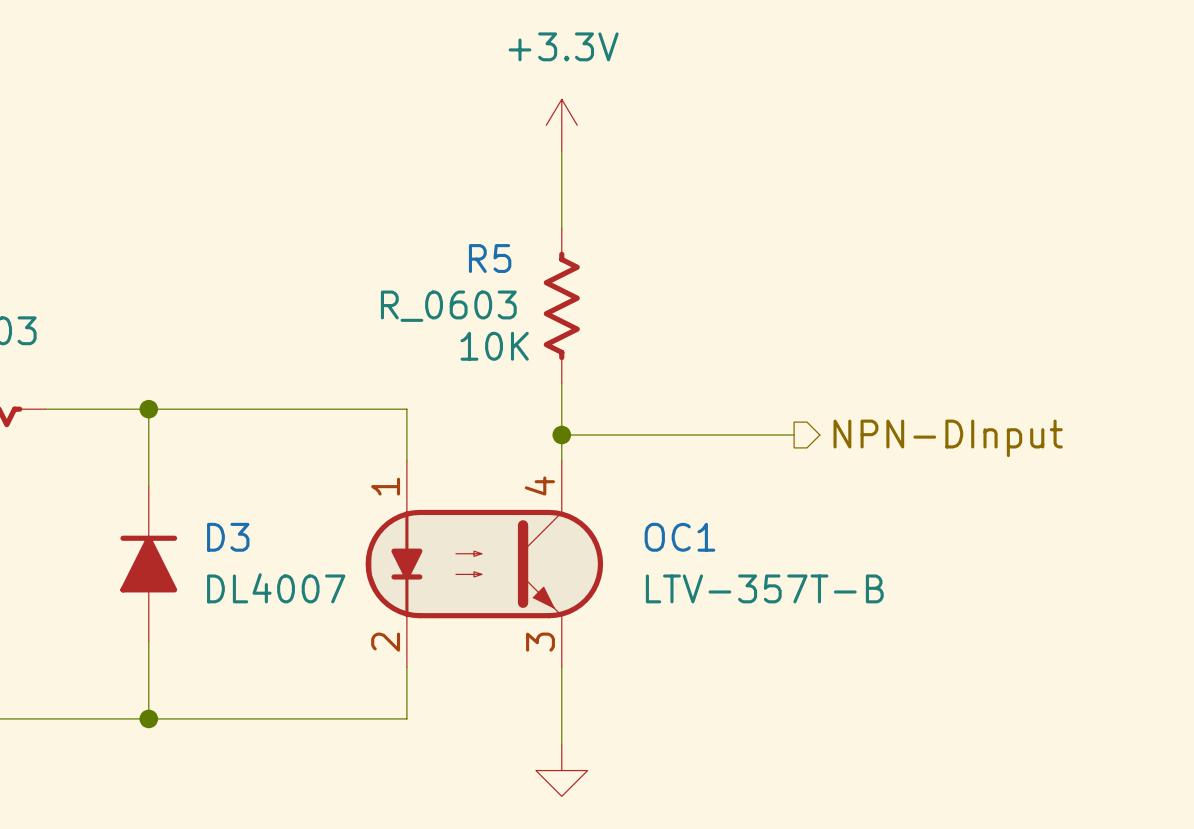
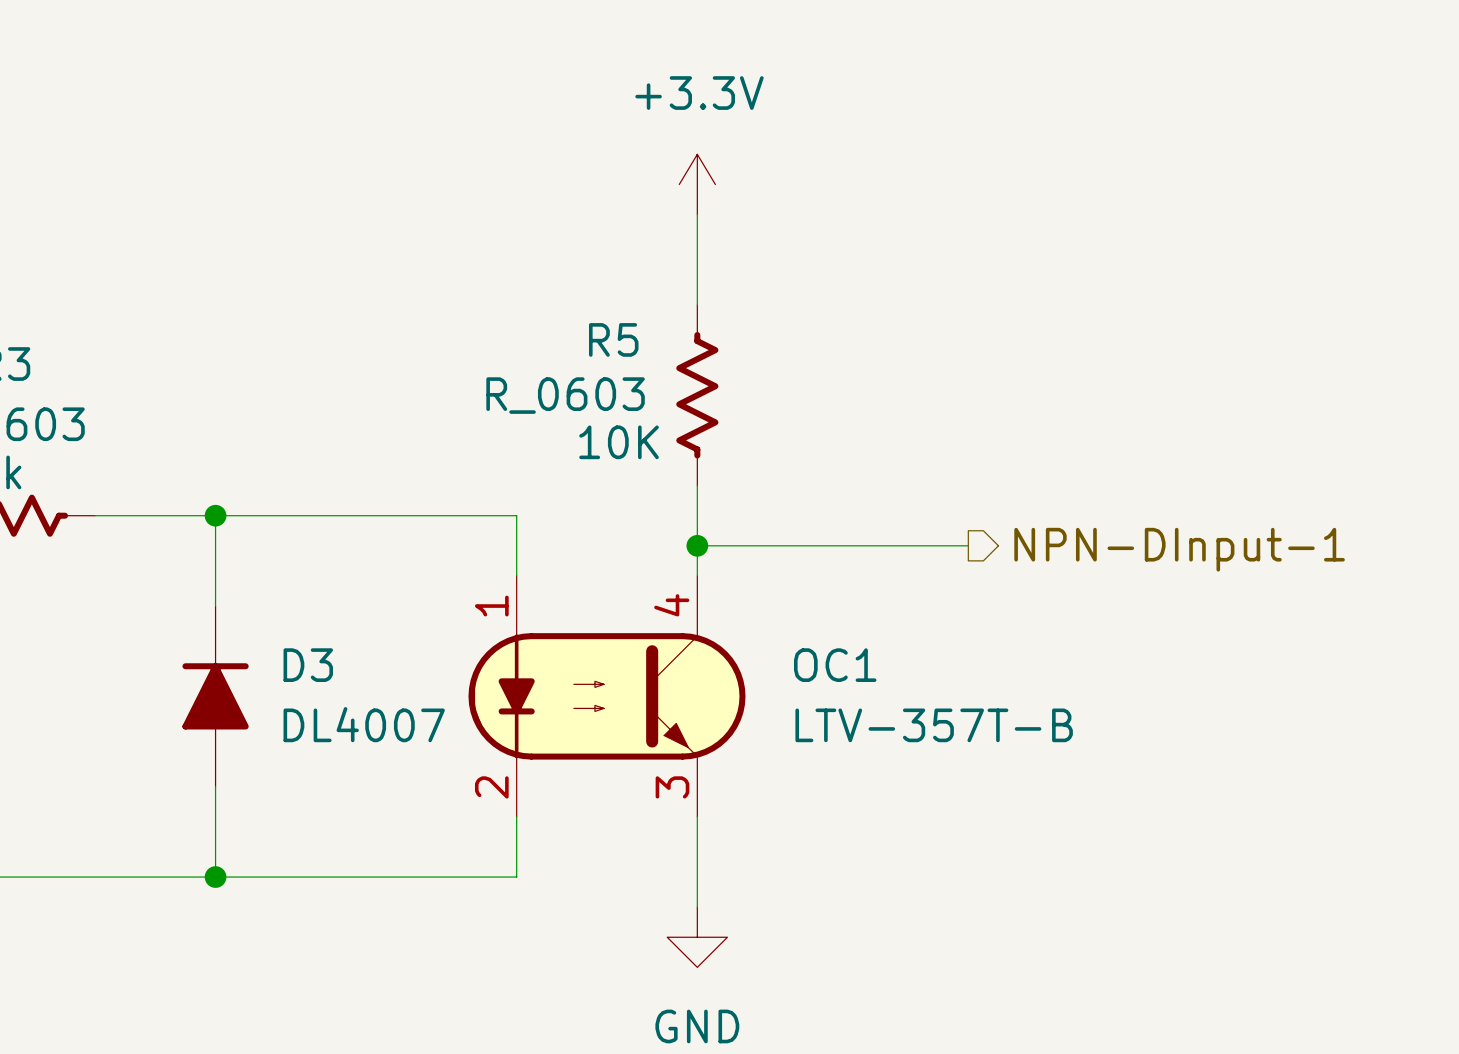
hierarchical label: NPN-DInput (948, 438) -> NPN-DInput-1 (1179, 549)

